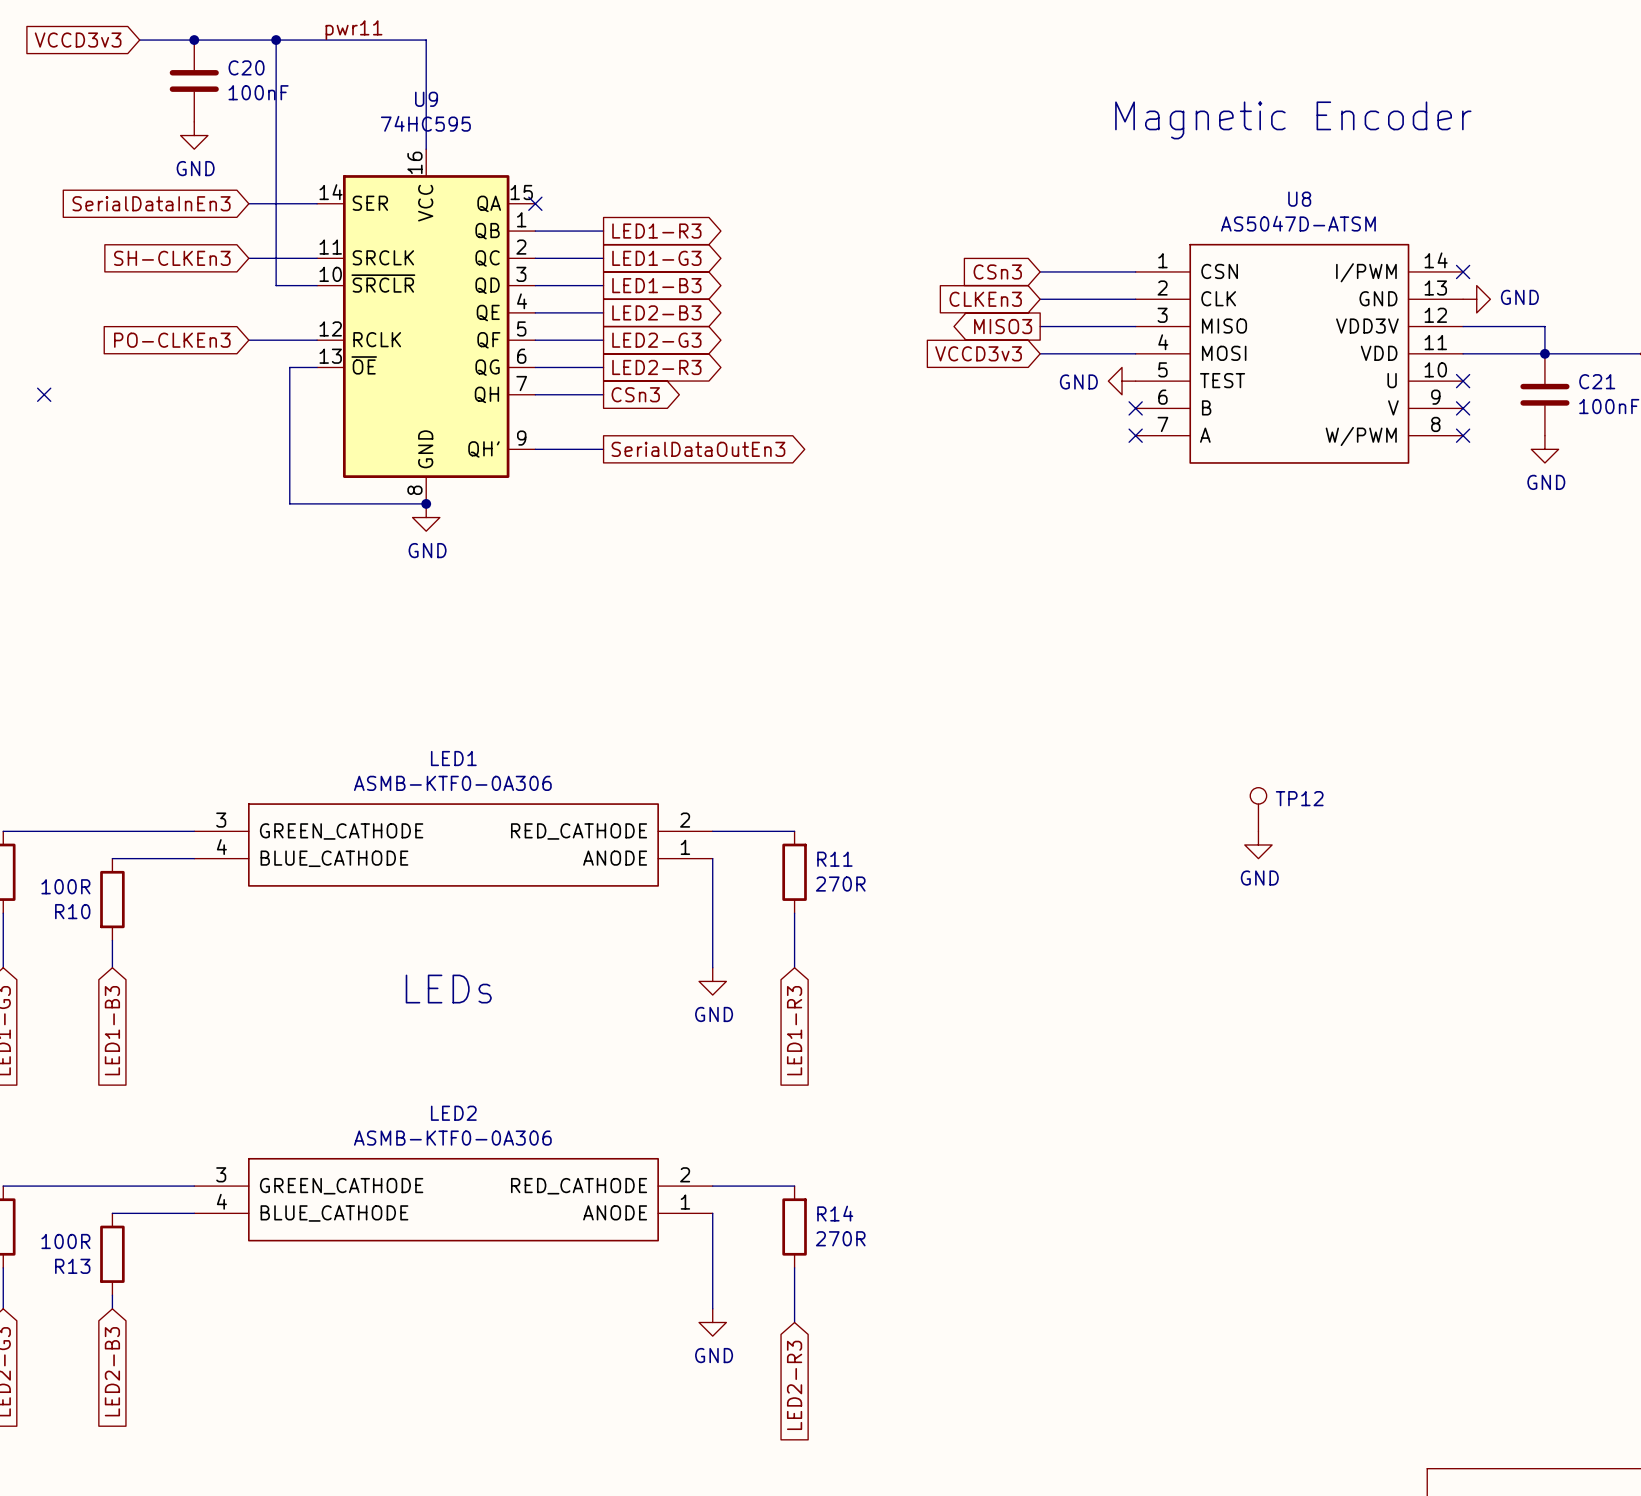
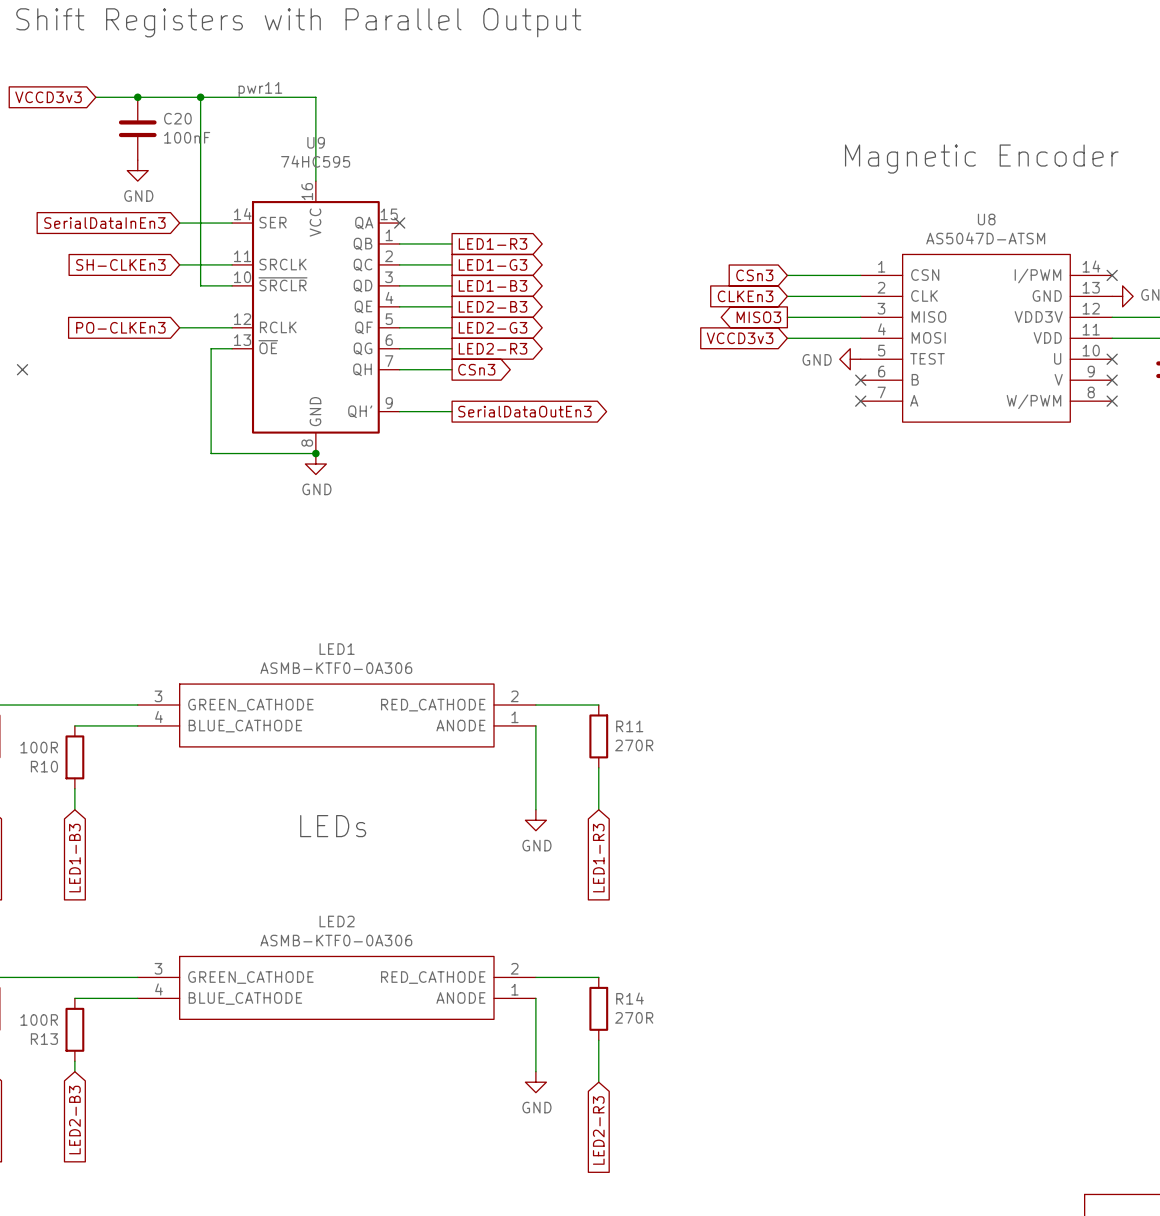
TP12: (1258, 809) -> none
power symbol: GND (1258, 844) -> none

